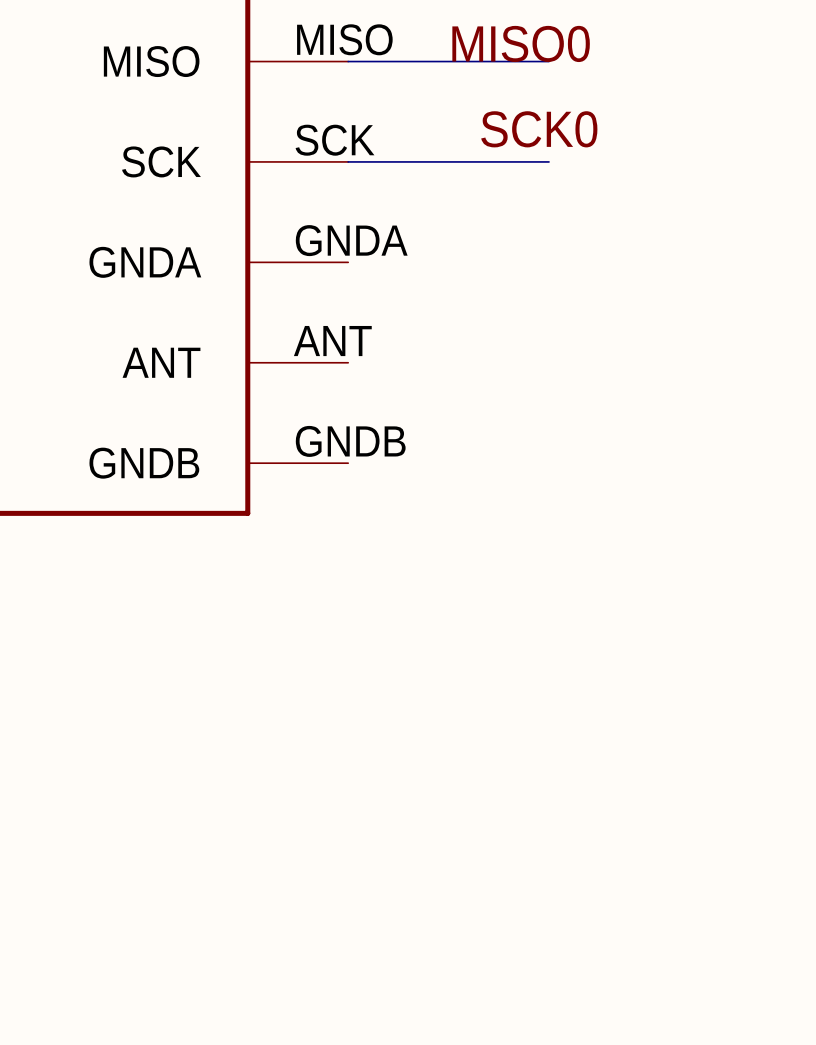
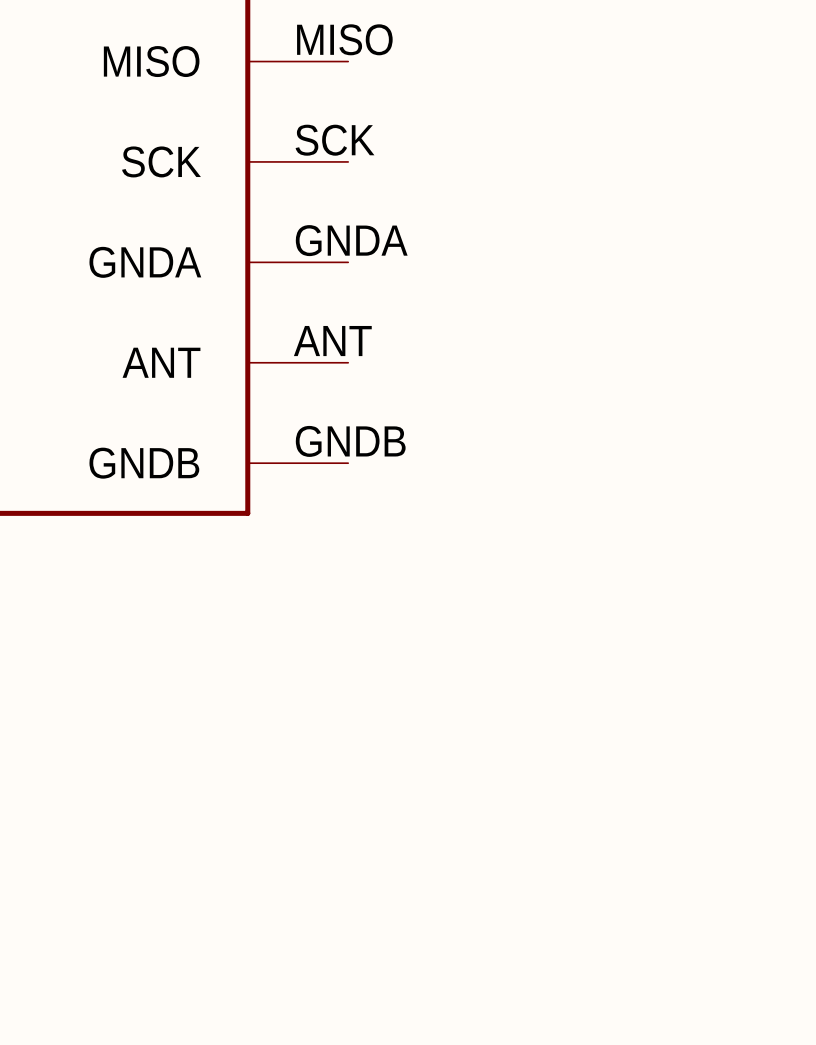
label: MISO0 (521, 43) -> none
wire: (348, 61) (549, 61) -> none
label: SCK0 (539, 129) -> none
wire: (348, 161) (549, 161) -> none

